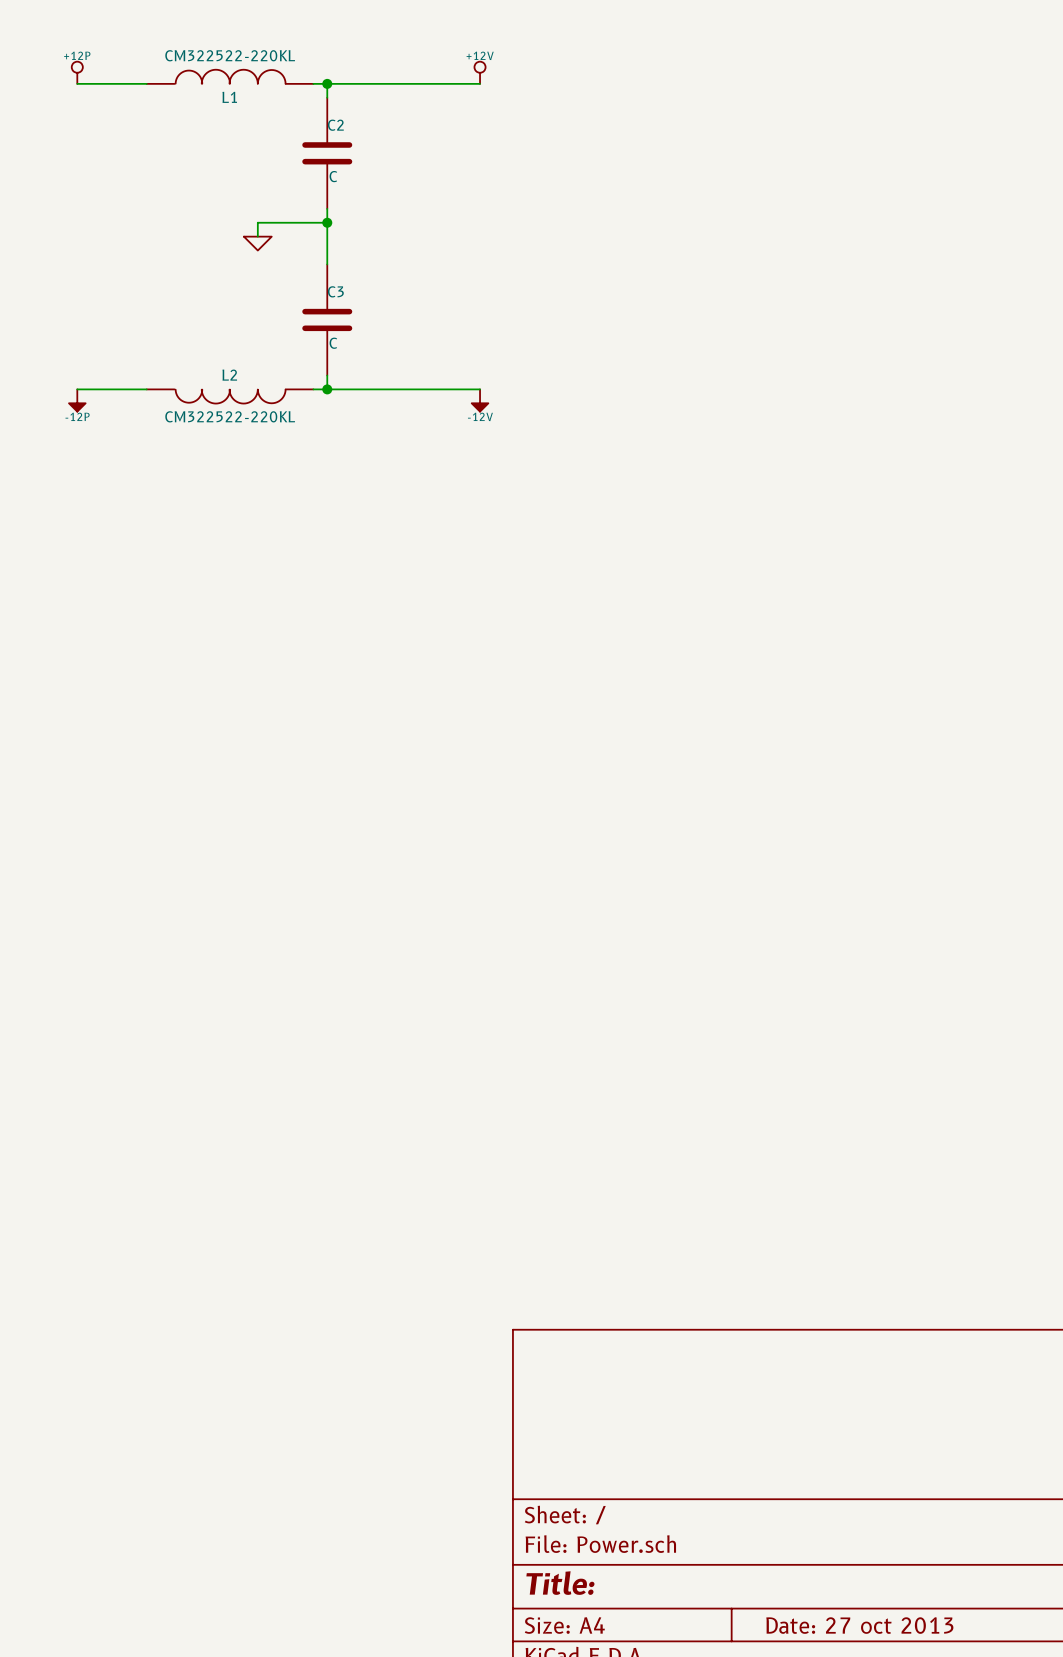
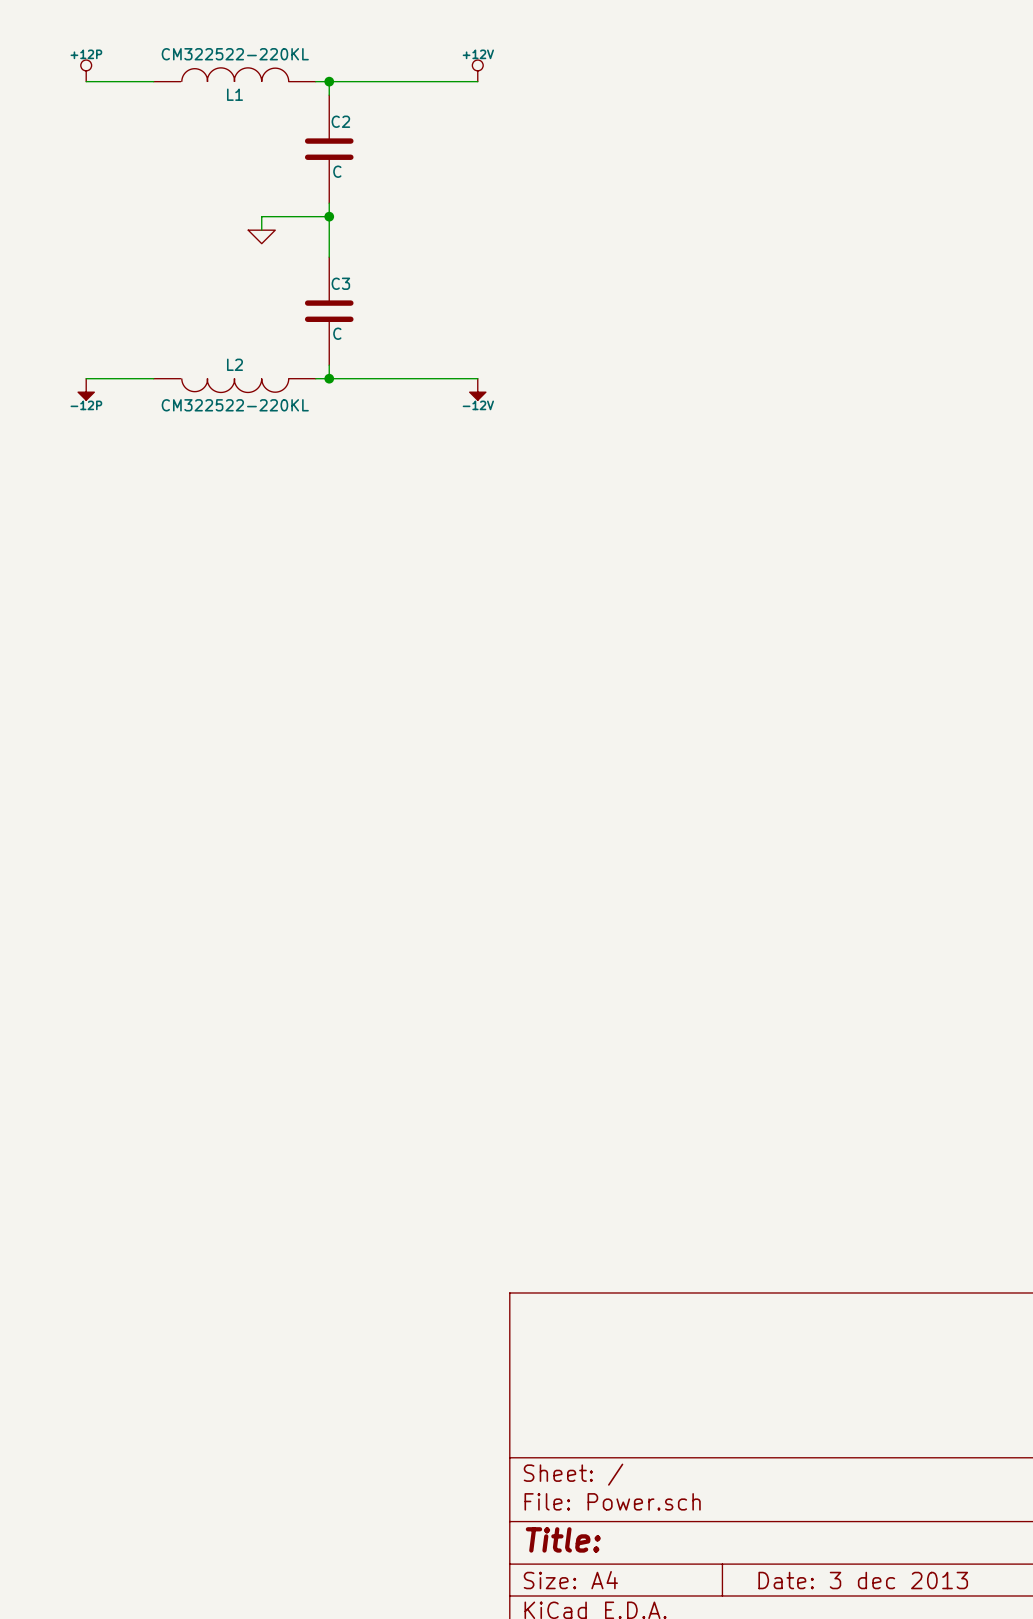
title block: Date: 27 oct 2013 (859, 1625) -> Date: 3 dec 2013 (863, 1580)

